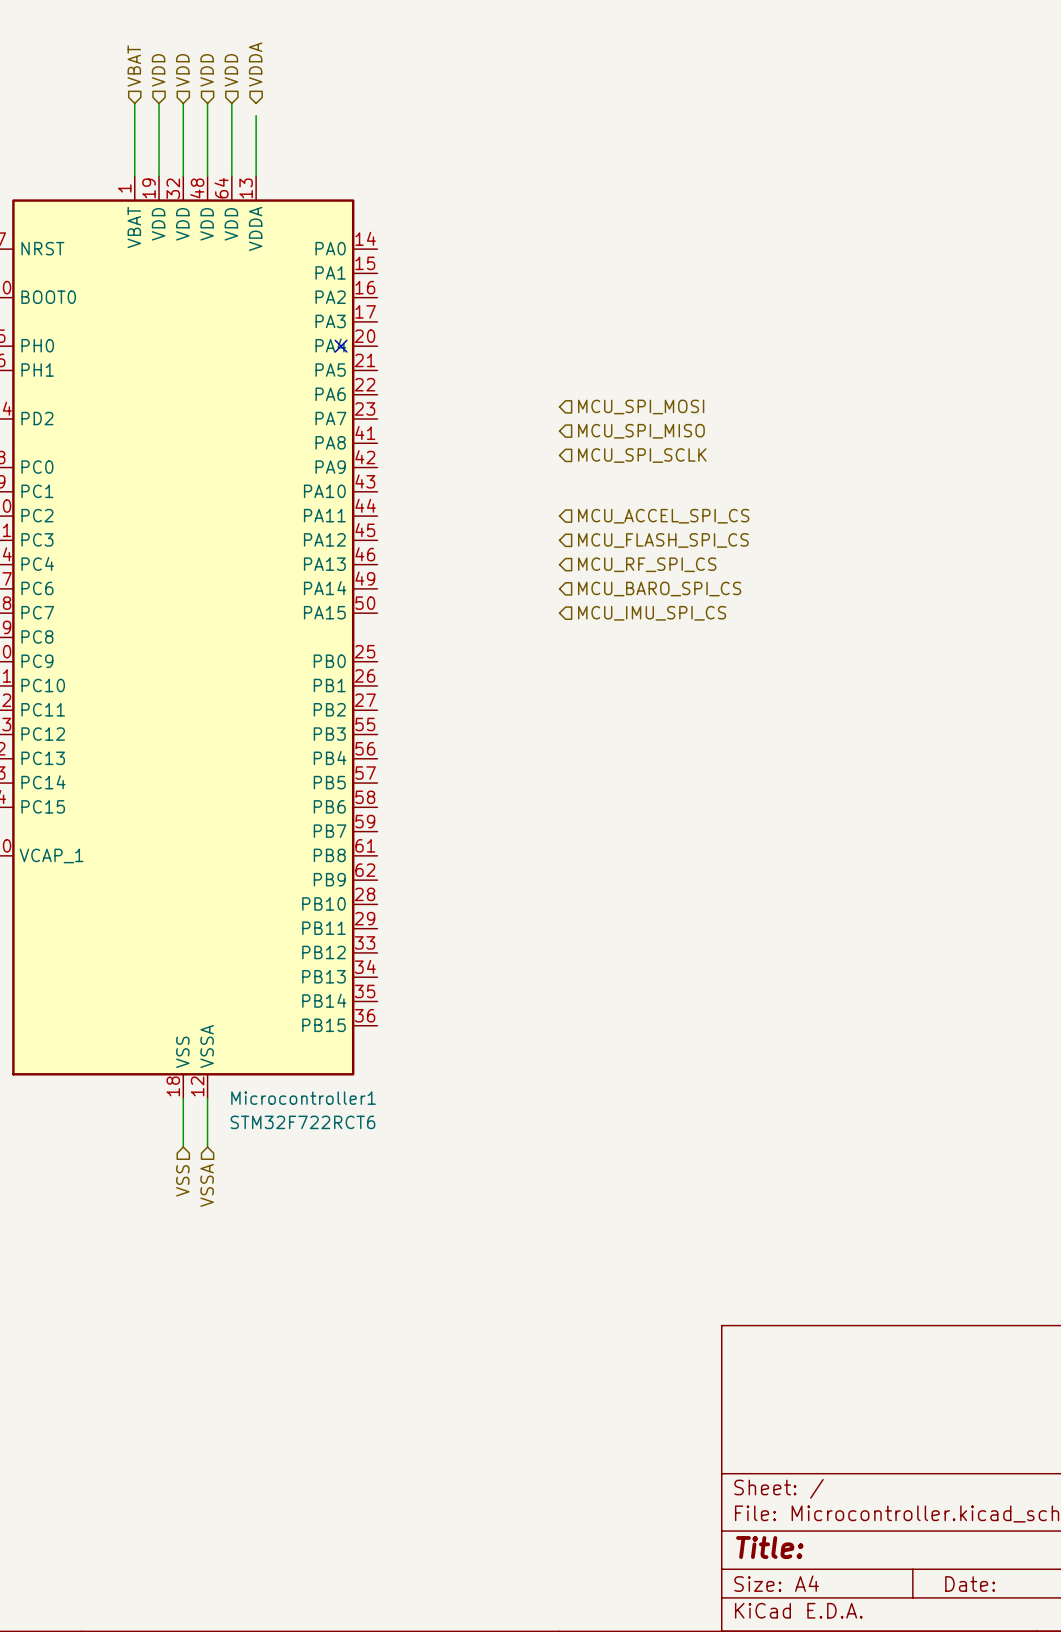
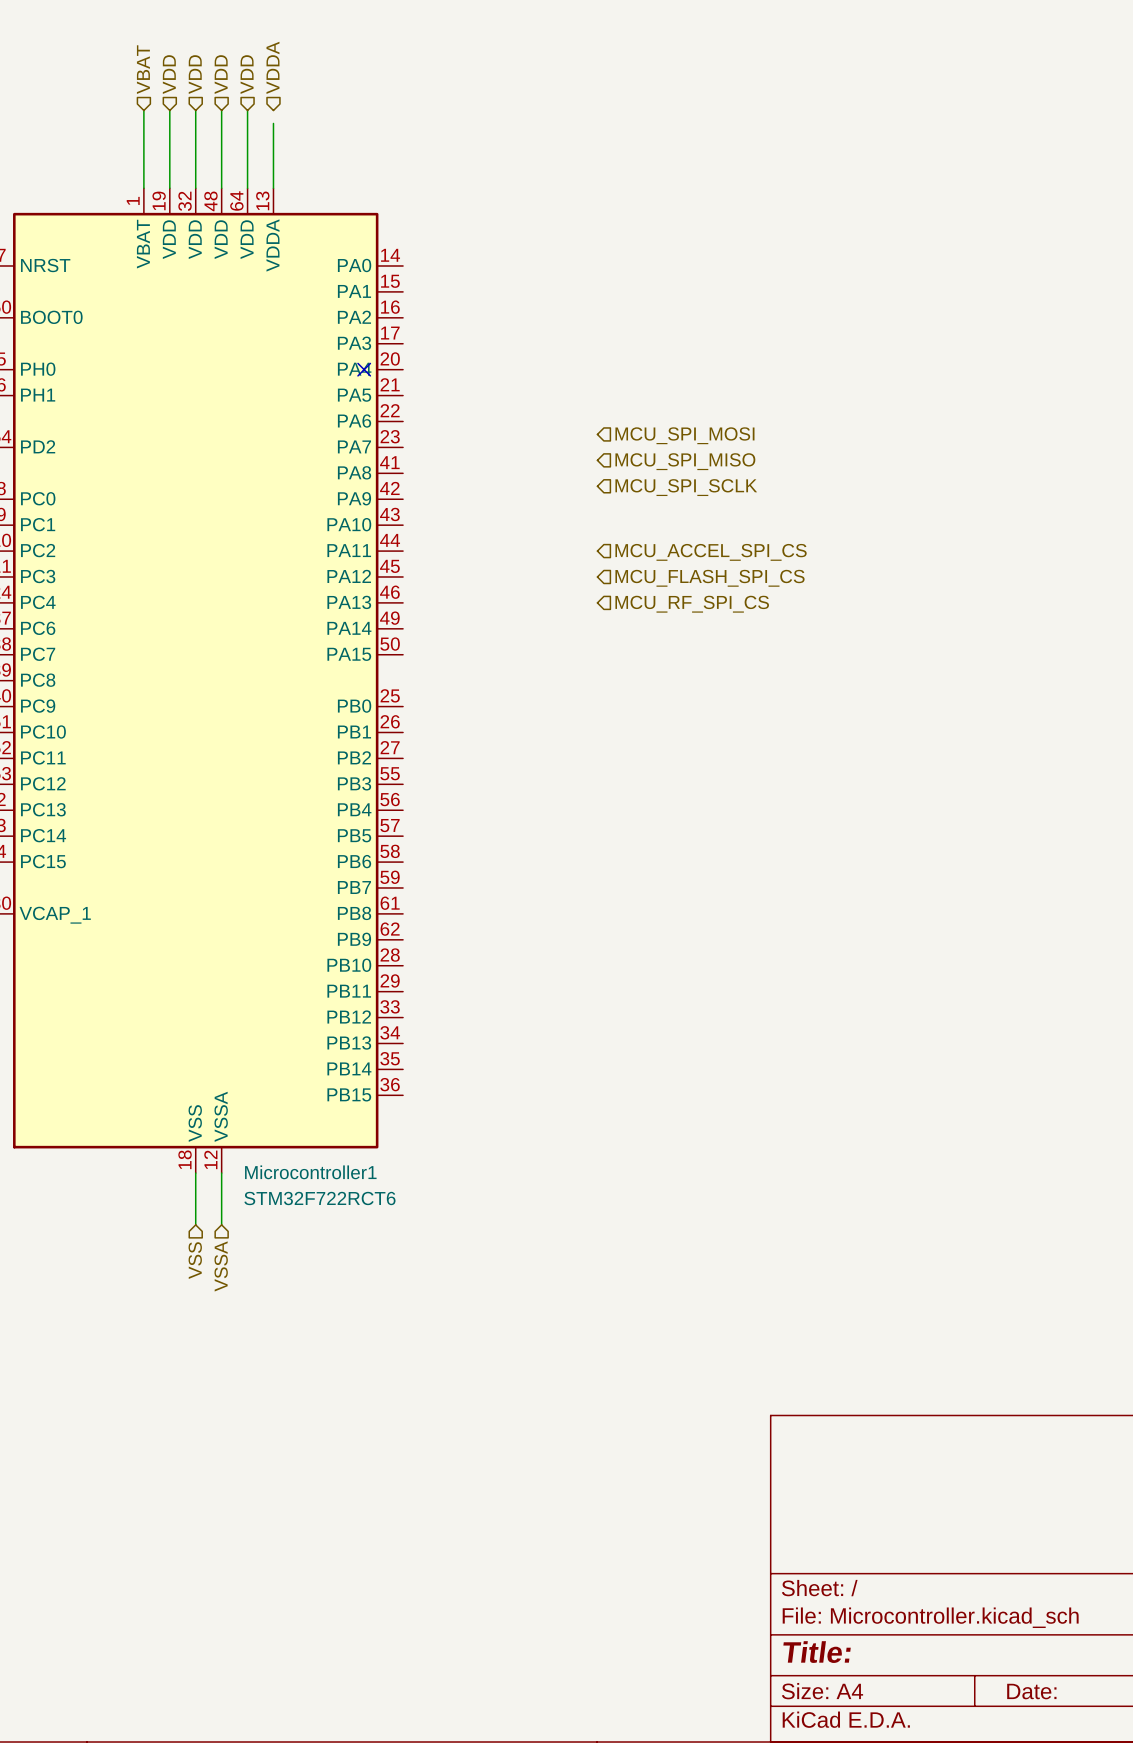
hierarchical label: MCU_BARO_SPI_CS (659, 589) -> none
hierarchical label: MCU_IMU_SPI_CS (652, 613) -> none

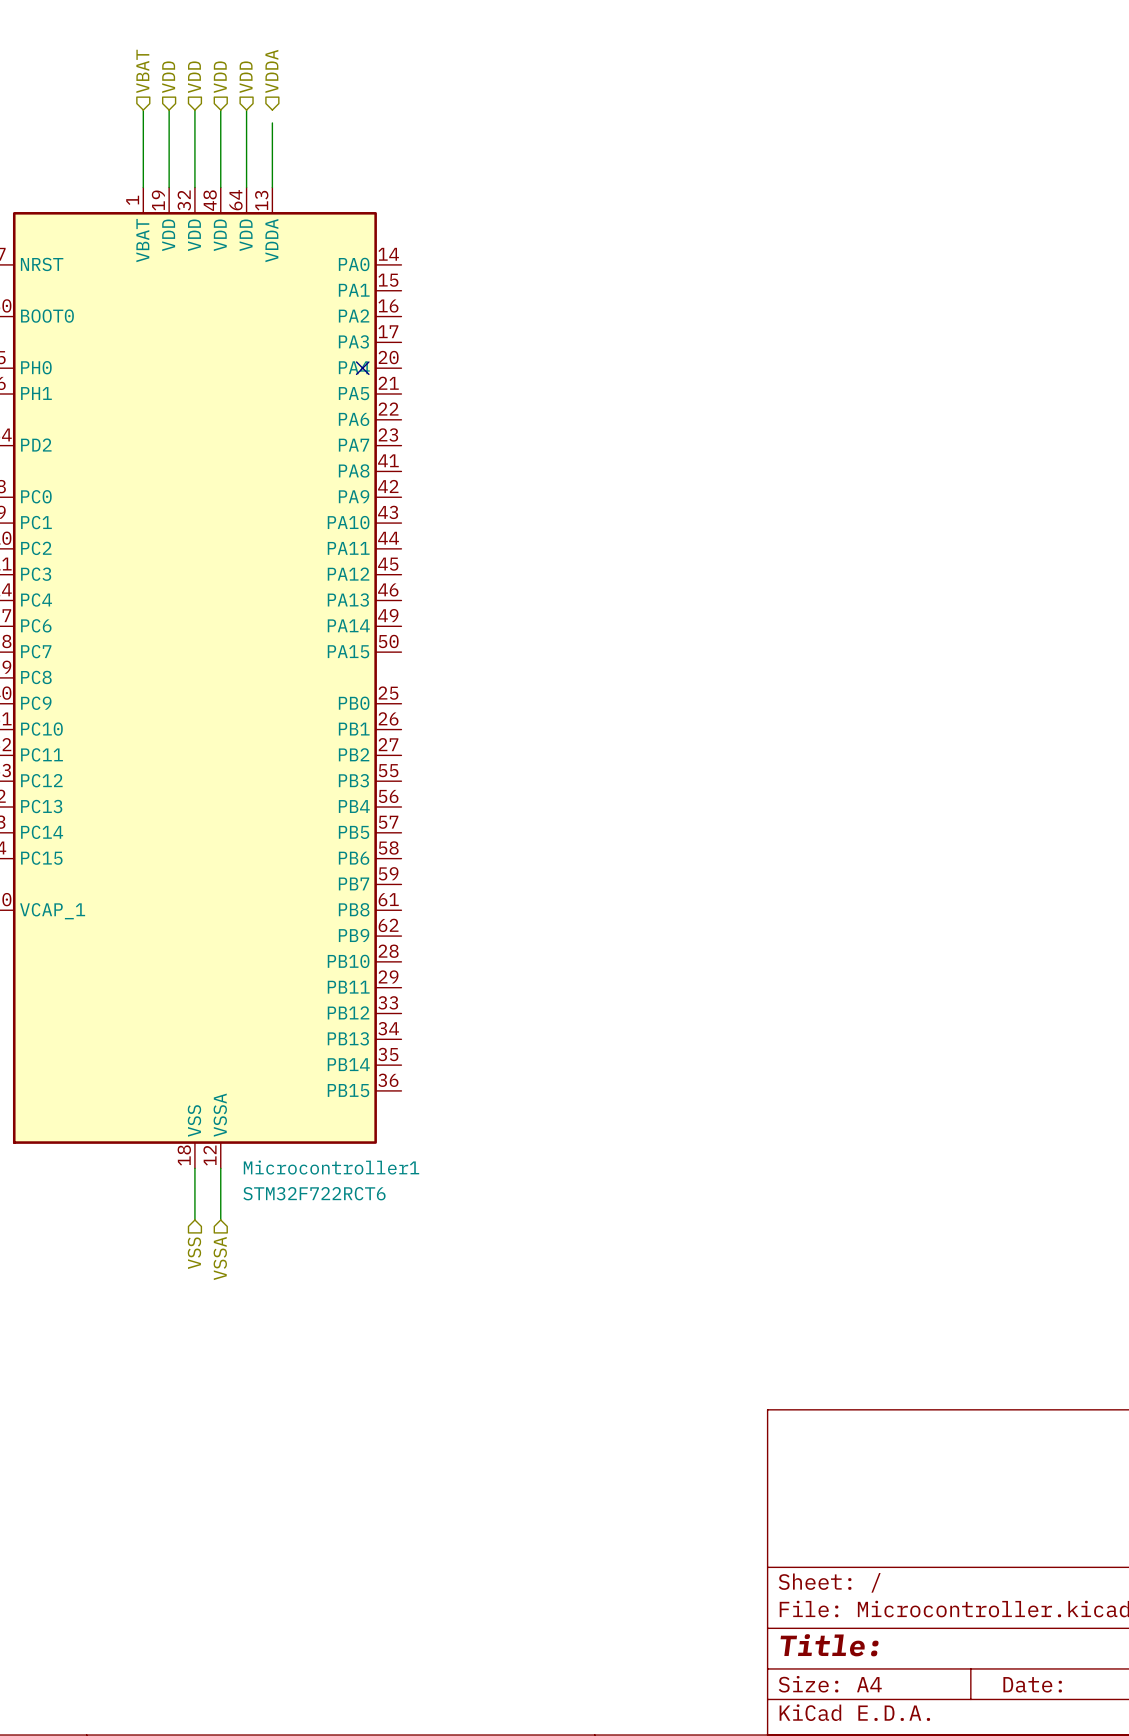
hierarchical label: MCU_SPI_MOSI (684, 435) -> none
hierarchical label: MCU_SPI_MISO (685, 461) -> none
hierarchical label: MCU_SPI_SCLK (686, 487) -> none
hierarchical label: MCU_ACCEL_SPI_CS (711, 552) -> none
hierarchical label: MCU_FLASH_SPI_CS (710, 578) -> none
hierarchical label: MCU_RF_SPI_CS (692, 604) -> none

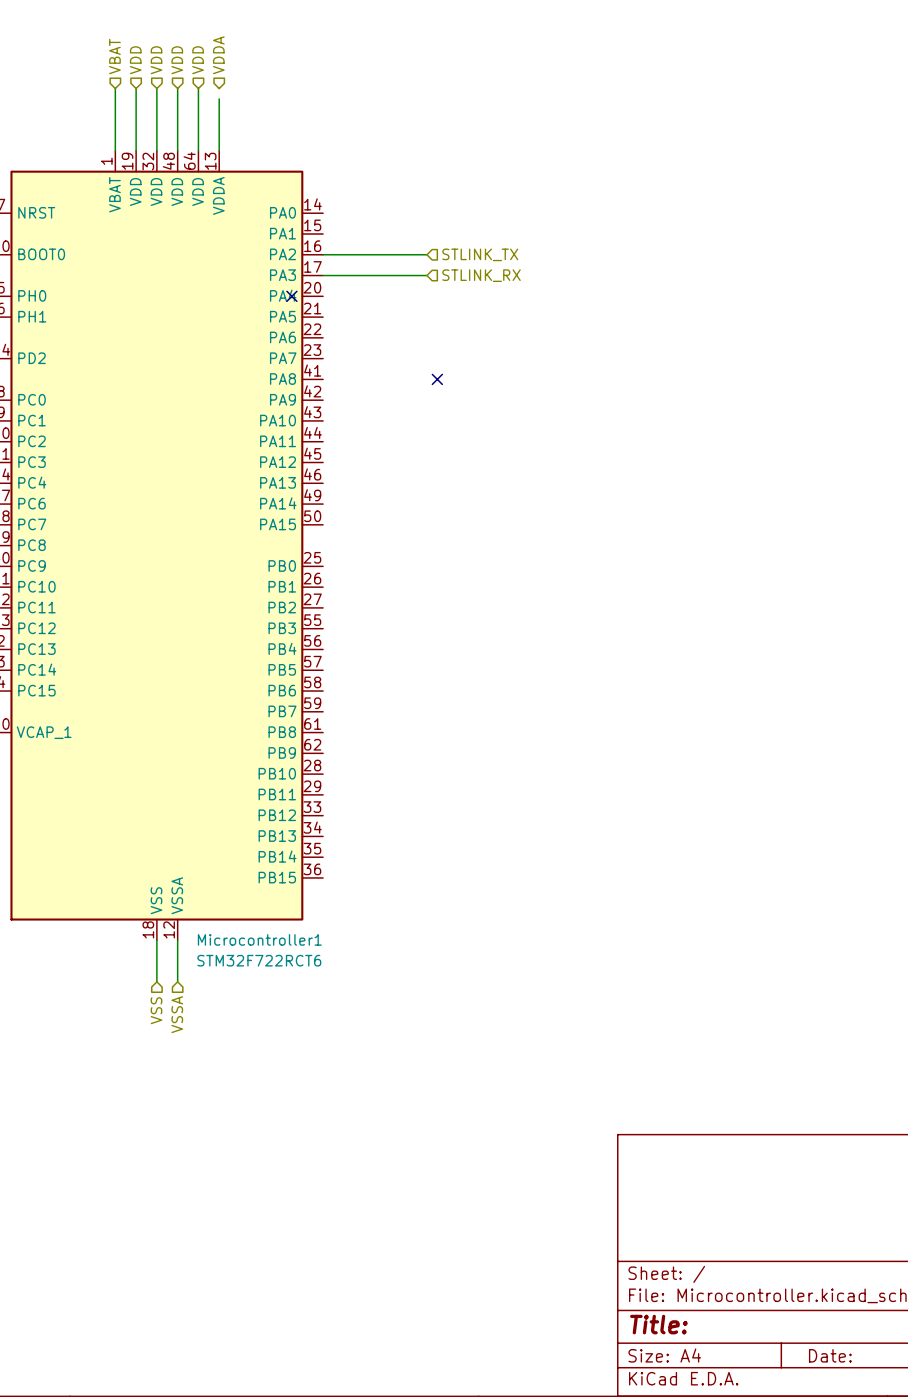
wire: none -> (323, 254) (426, 254)
hierarchical label: none -> STLINK_TX (480, 254)
wire: none -> (323, 275) (426, 275)
hierarchical label: none -> STLINK_RX (481, 275)
no-connect mark: none -> (437, 379)

